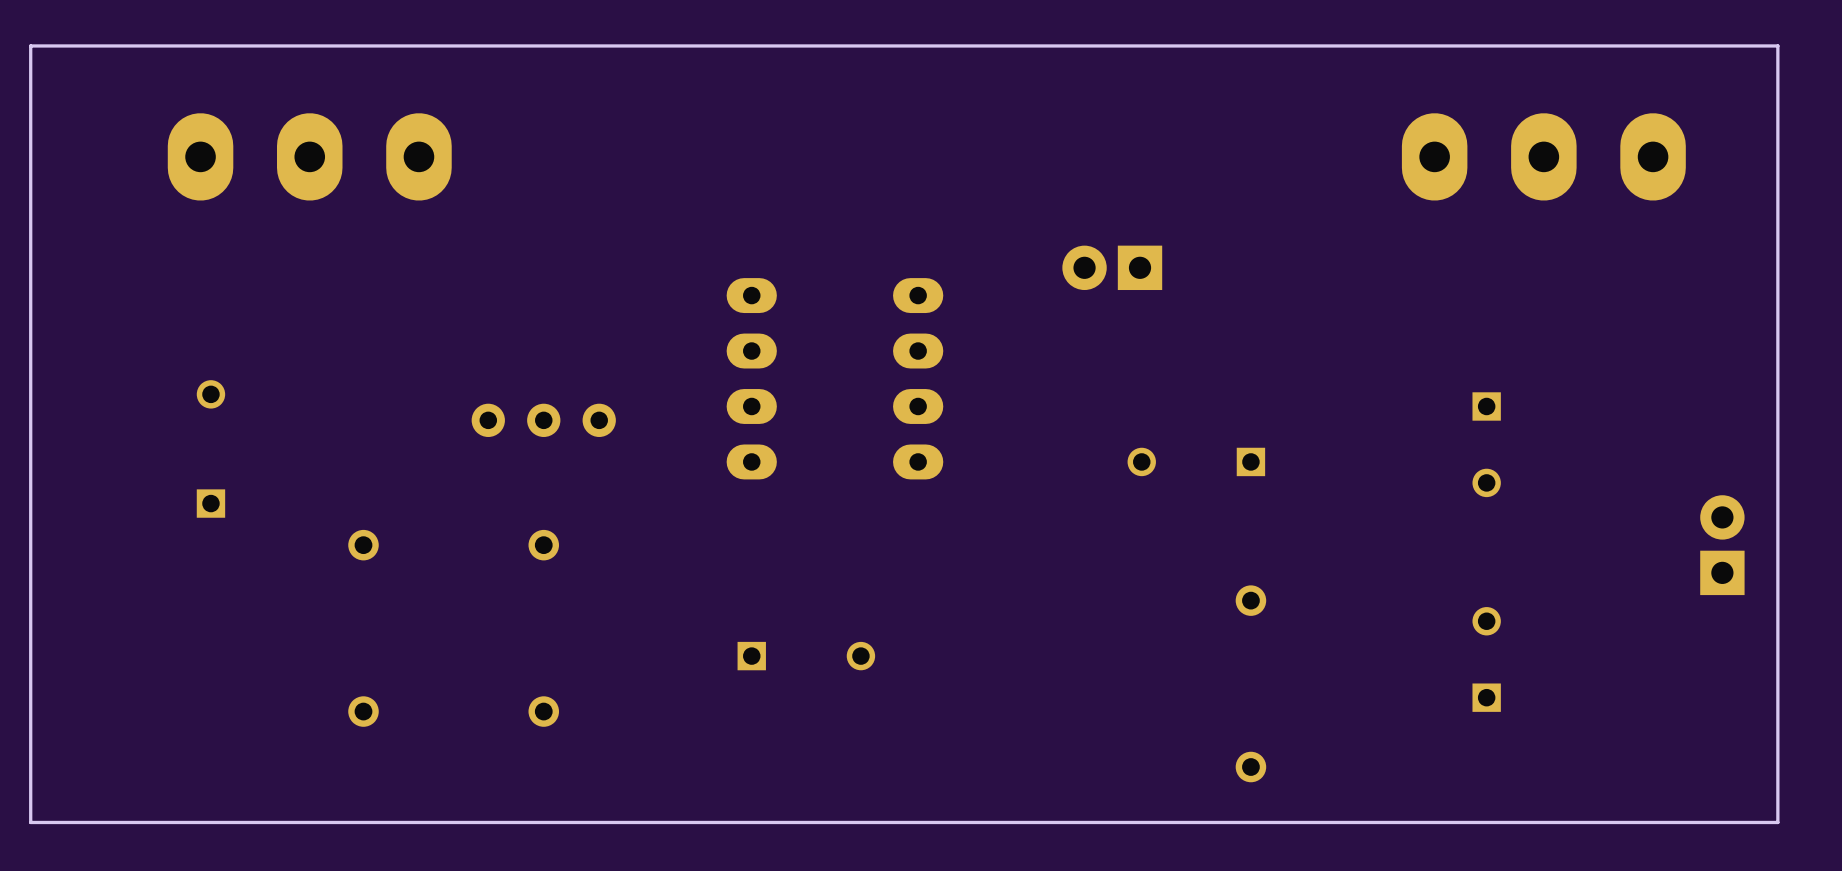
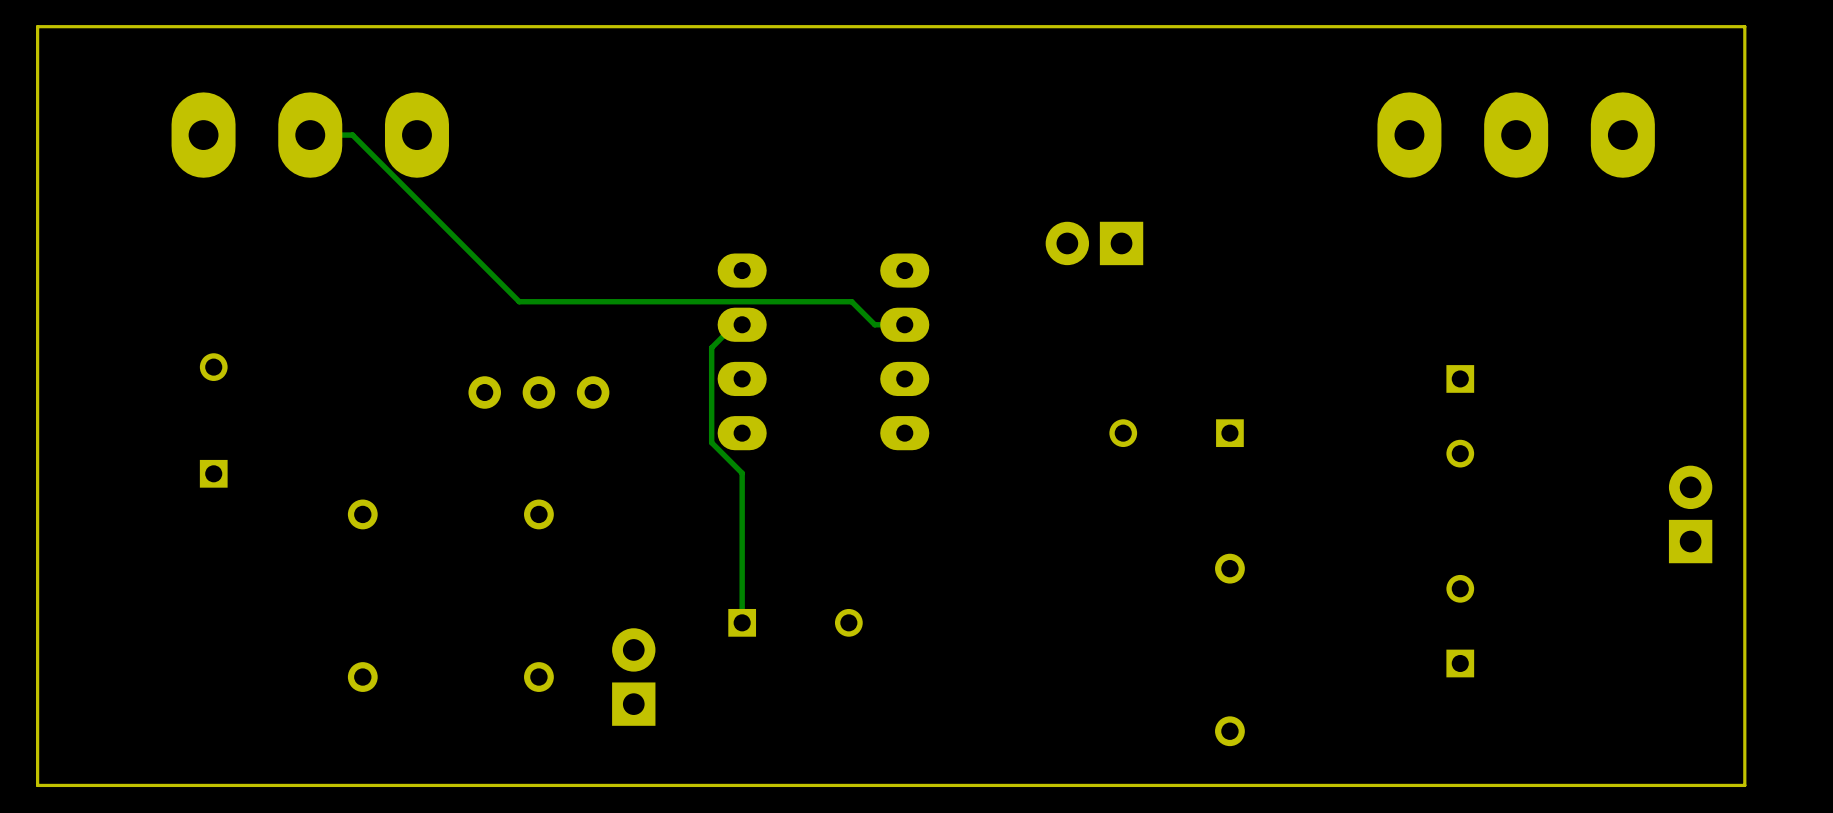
track: none -> (310, 135) (352, 135) (519, 301) (851, 301) (874, 324) (904, 324)
track: none -> (742, 324) (734, 324) (711, 347) (711, 442) (742, 473) (742, 622)
part: none -> (633, 677)

